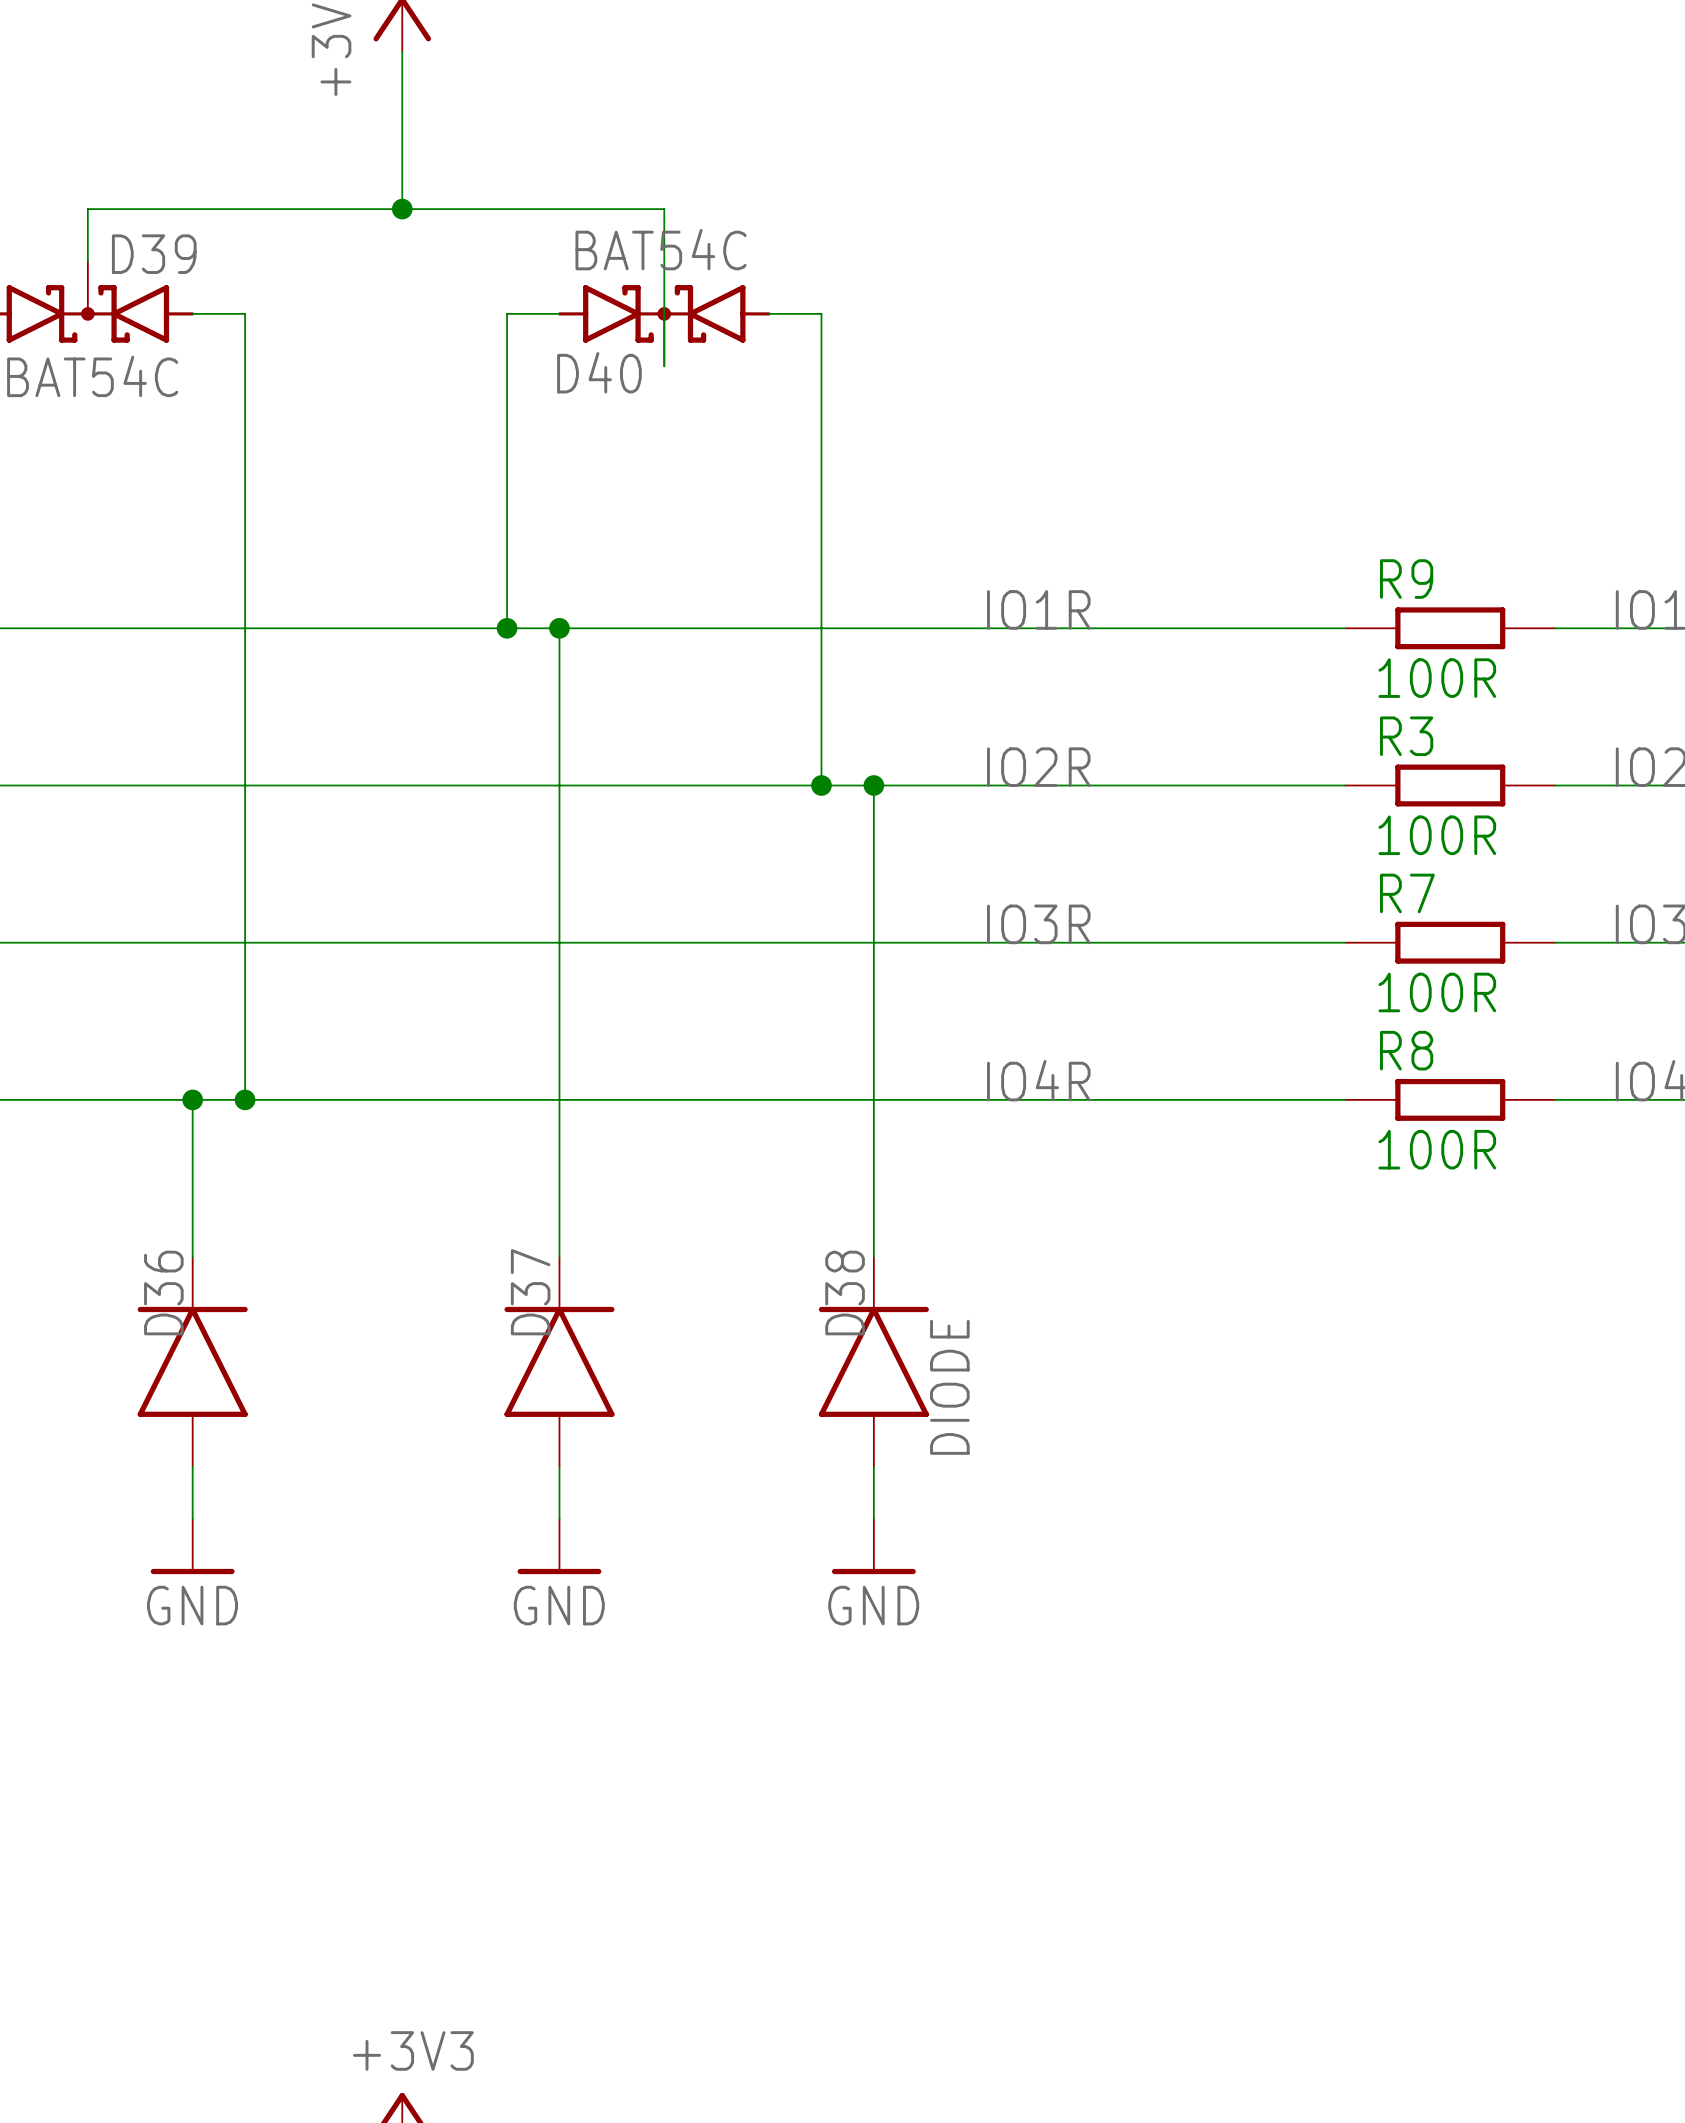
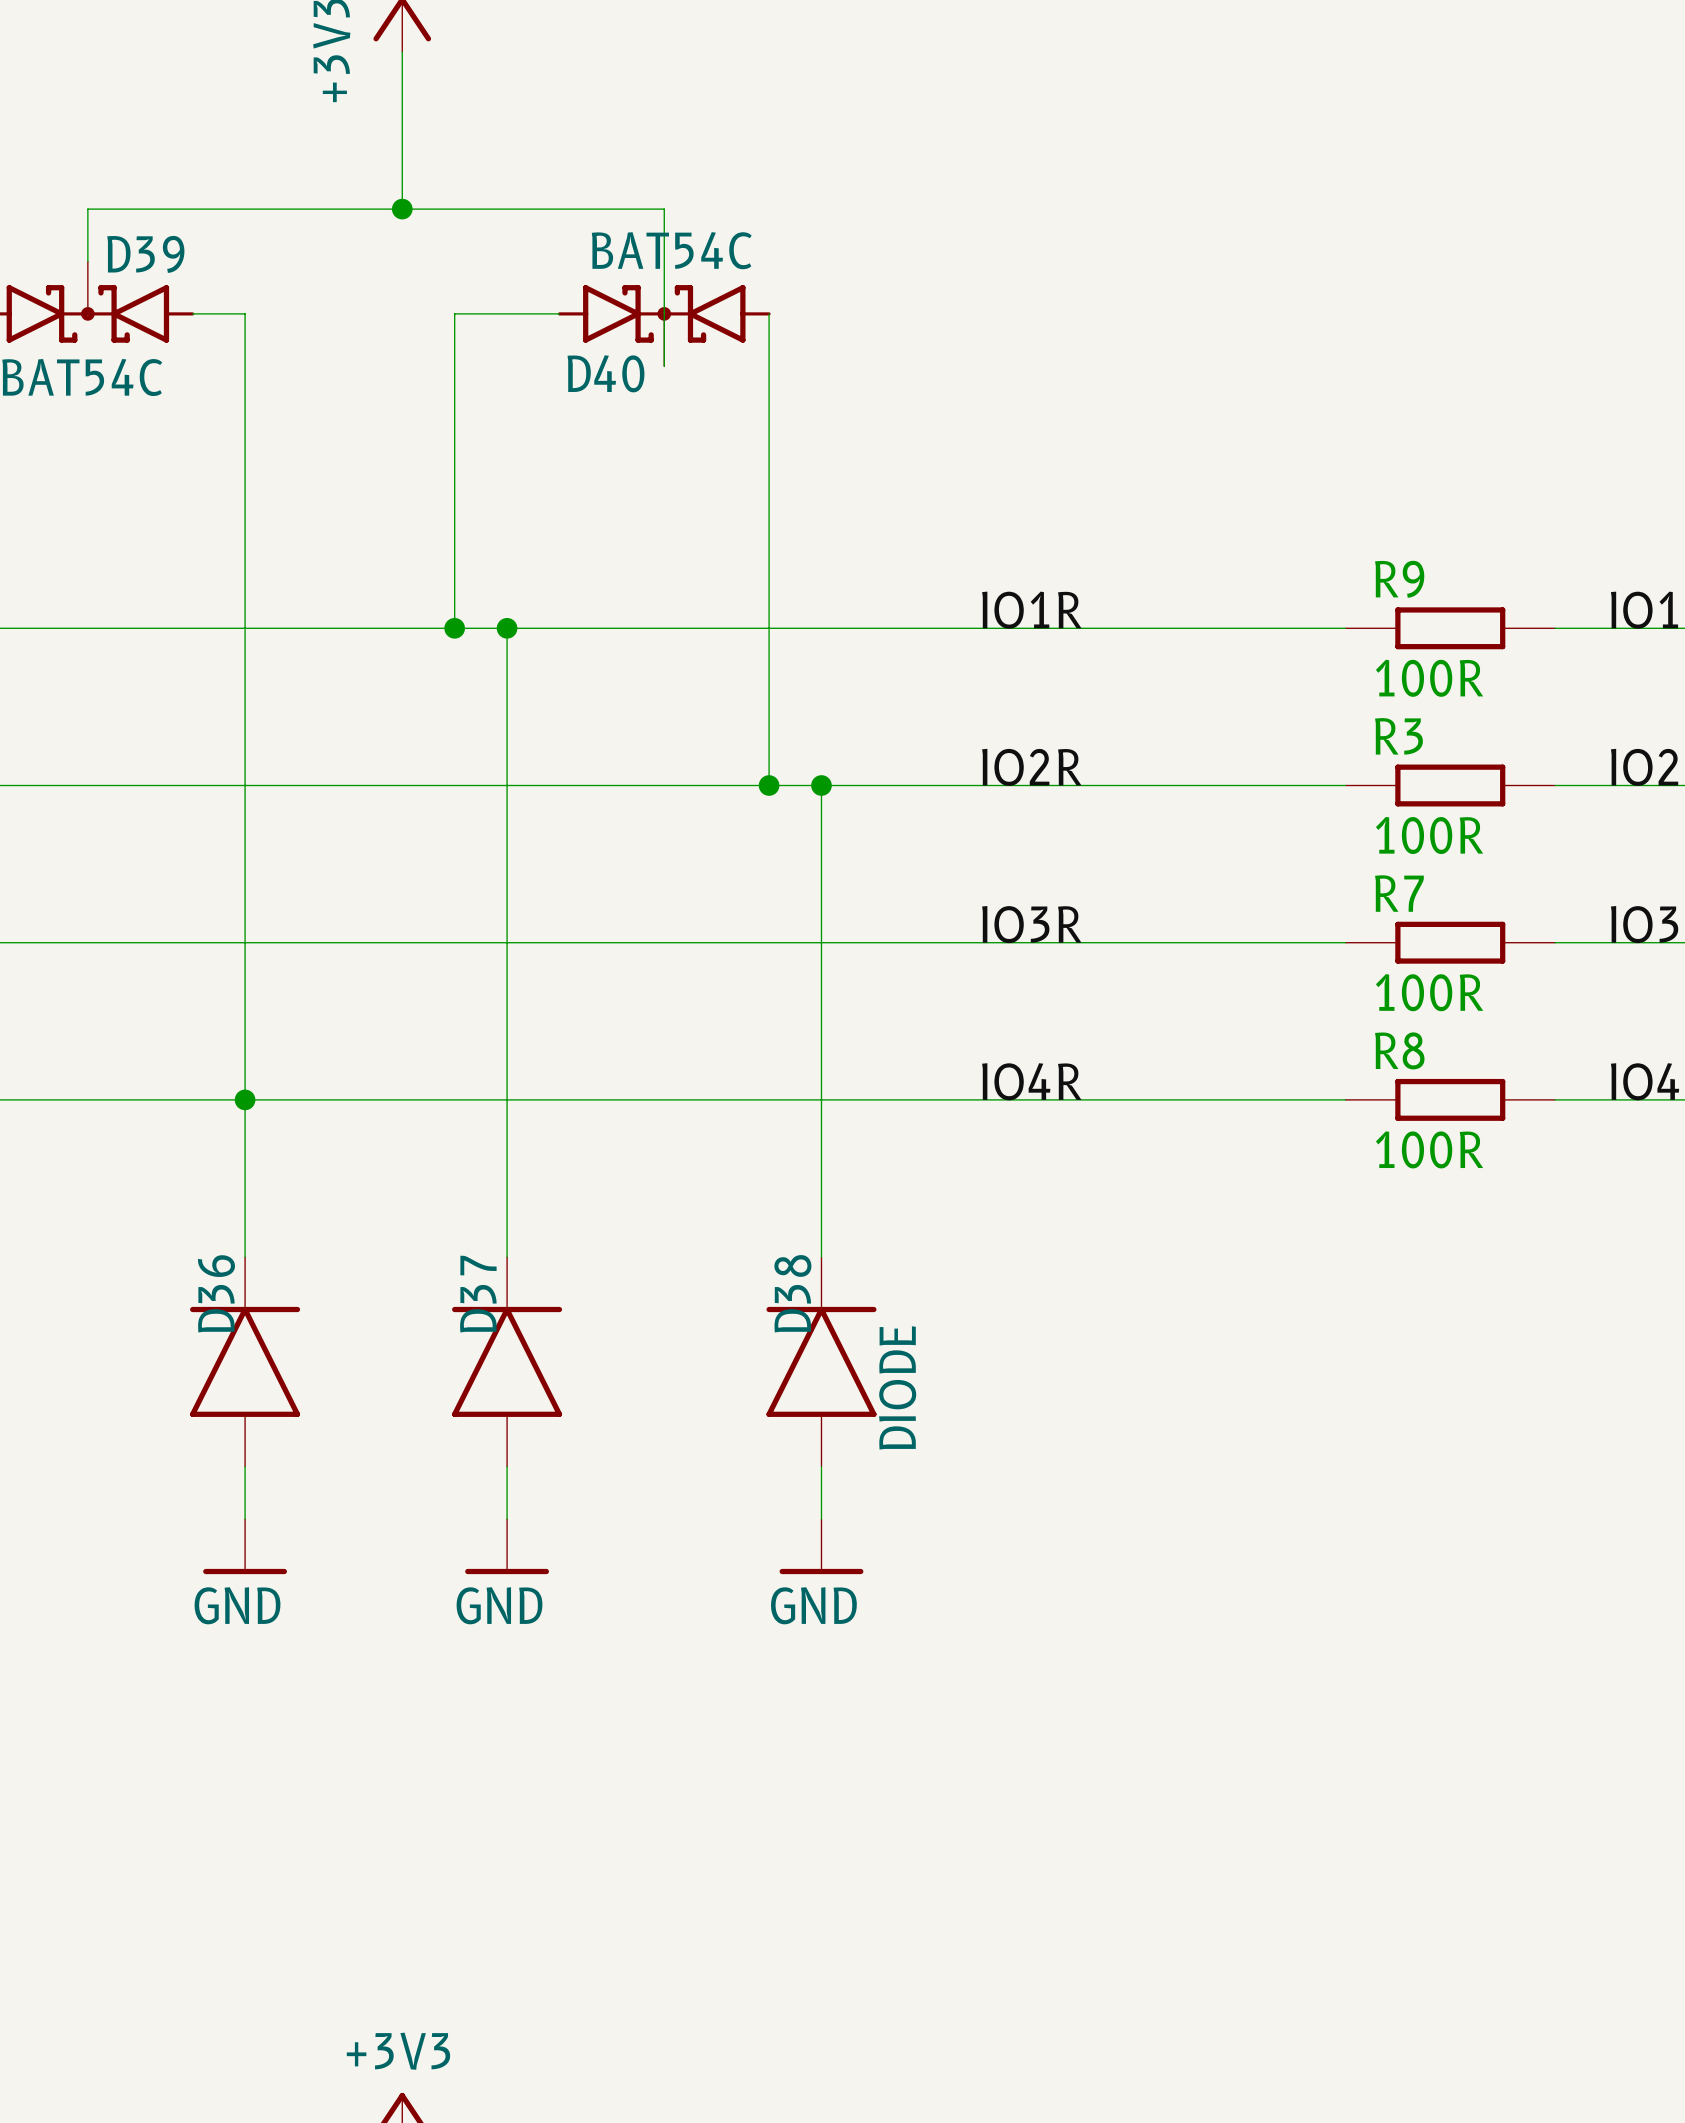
wire: (507, 313) (507, 628) -> (507, 313) (454, 313) (454, 628)
wire: (769, 313) (821, 313) (821, 785) -> (769, 313) (769, 785)
wire: (559, 628) (559, 1257) -> (507, 628) (507, 1257)
junction position: (559, 628) -> (454, 628)
wire: (873, 785) (873, 1257) -> (821, 785) (821, 1257)
junction position: (873, 785) -> (769, 785)
wire: (192, 1099) (192, 1257) -> (245, 1099) (245, 1257)
junction: (192, 1099) -> none
D36 position: (192, 1361) -> (245, 1361)
D37 position: (559, 1361) -> (507, 1361)
D38 position: (873, 1361) -> (821, 1361)
wire: (192, 1466) (192, 1519) -> (245, 1466) (245, 1519)
wire: (559, 1466) (559, 1519) -> (507, 1466) (507, 1519)
wire: (873, 1466) (873, 1519) -> (821, 1466) (821, 1519)
power symbol position: GND (192, 1546) -> GND (245, 1546)
power symbol position: GND (559, 1546) -> GND (507, 1546)
power symbol position: GND (873, 1546) -> GND (821, 1546)

